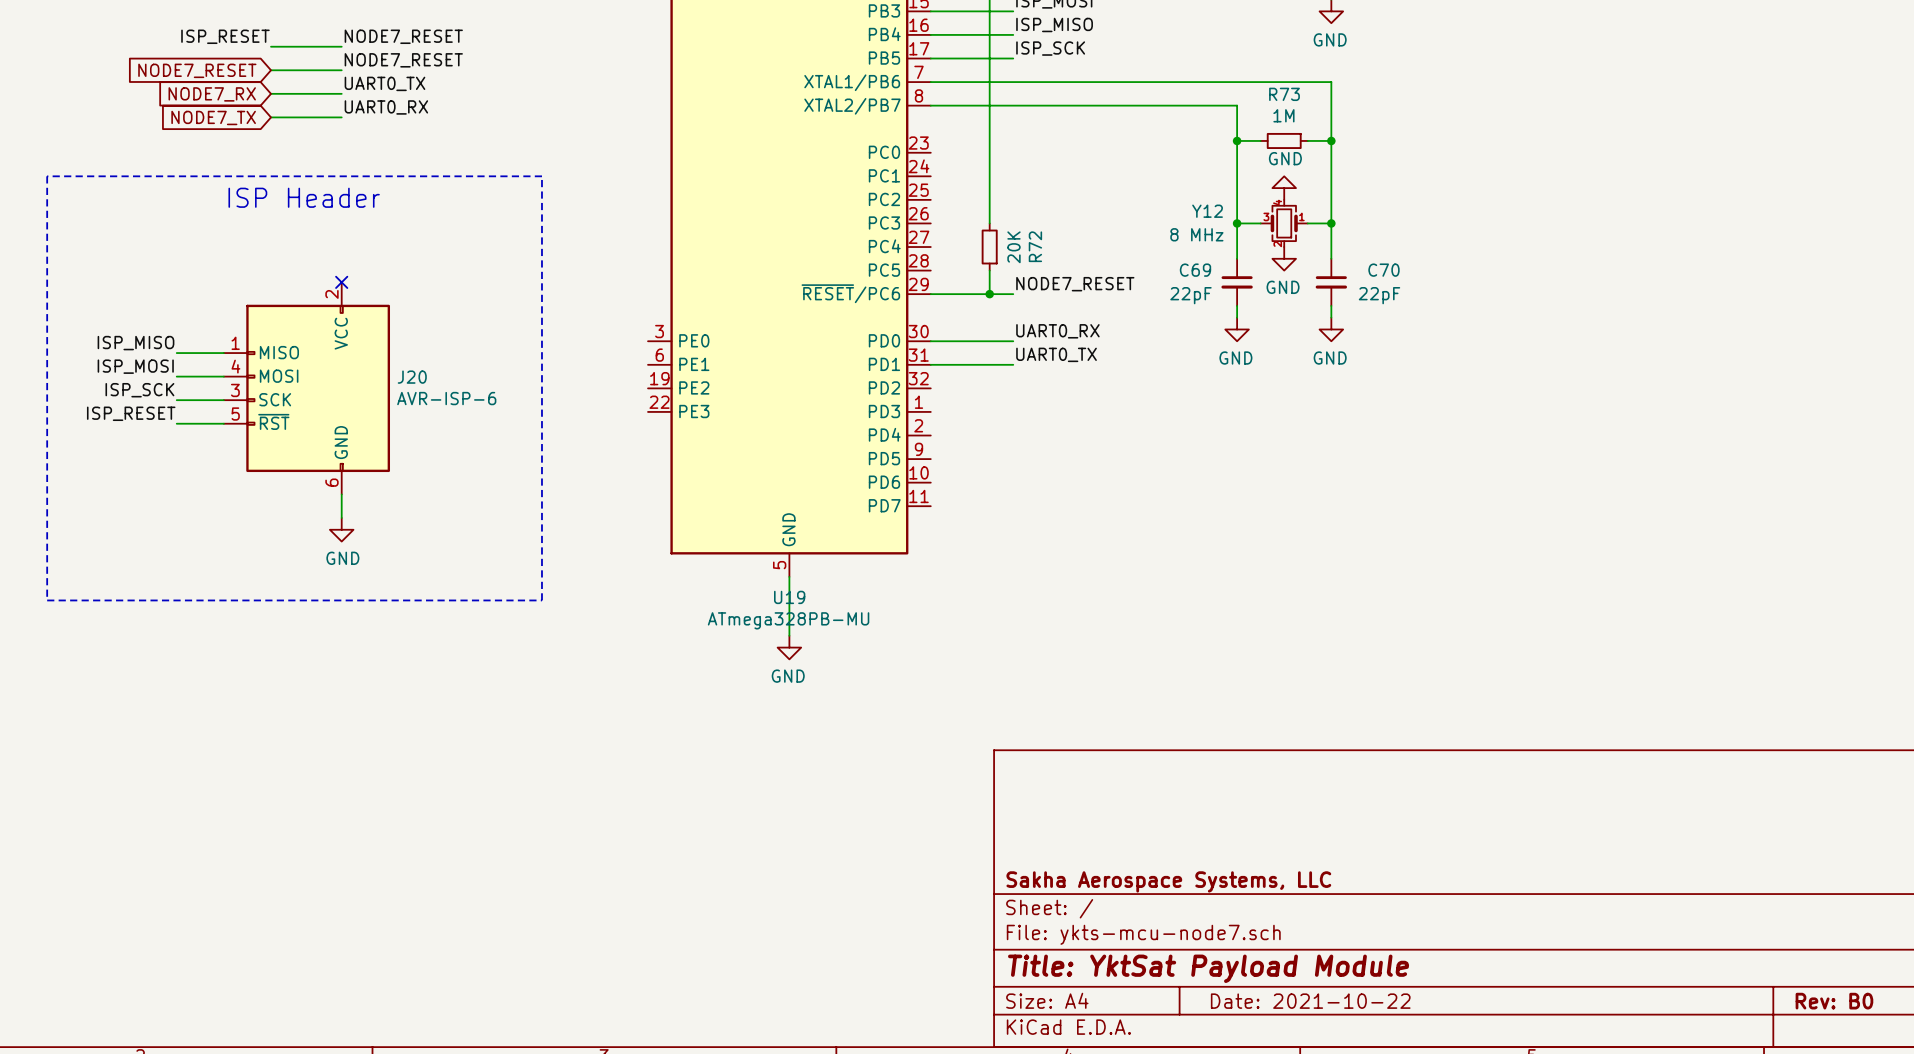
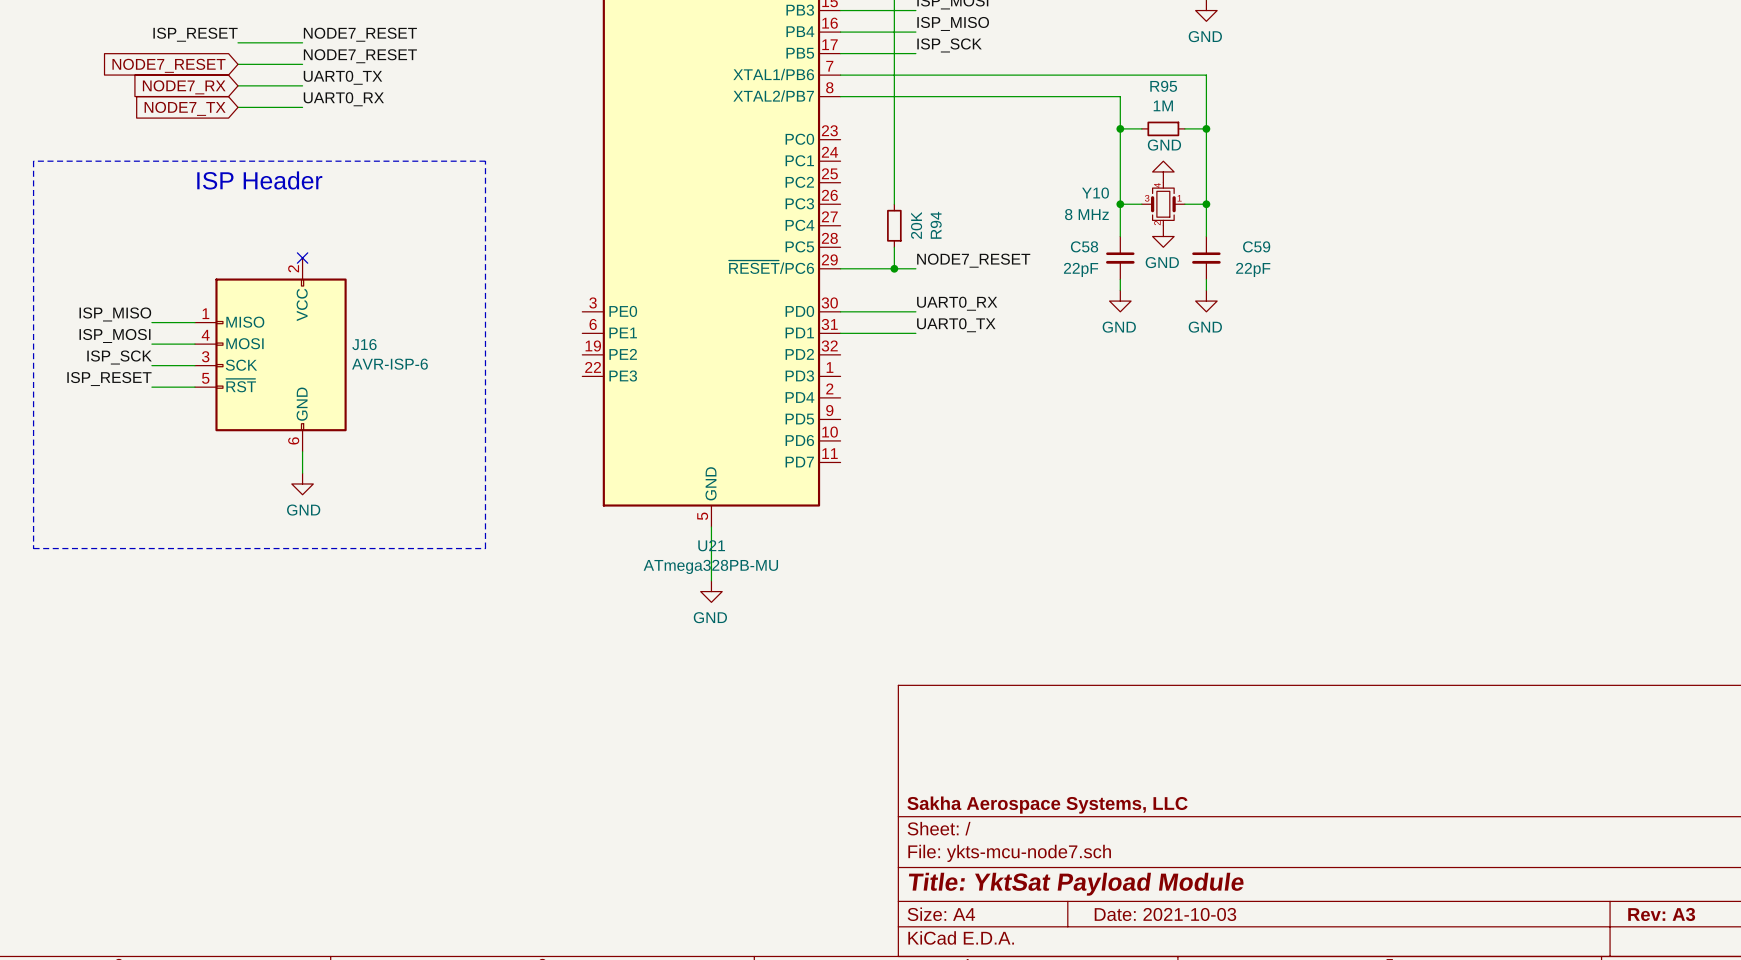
R73 name: R73 (1284, 94) -> R95 (1163, 86)
Y12 name: Y12 (1207, 211) -> Y10 (1095, 193)
R72 name: R72 (1035, 246) -> R94 (936, 225)
C69 name: C69 (1195, 270) -> C58 (1084, 246)
C70 name: C70 (1383, 270) -> C59 (1256, 246)
J20 name: J20 (412, 377) -> J16 (364, 344)
U19 name: U19 (789, 597) -> U21 (711, 545)
title block: Date: 2021-10-22 (1310, 1001) -> Date: 2021-10-03 (1165, 914)
title block: Rev: B0 (1834, 1001) -> Rev: A3 (1661, 914)

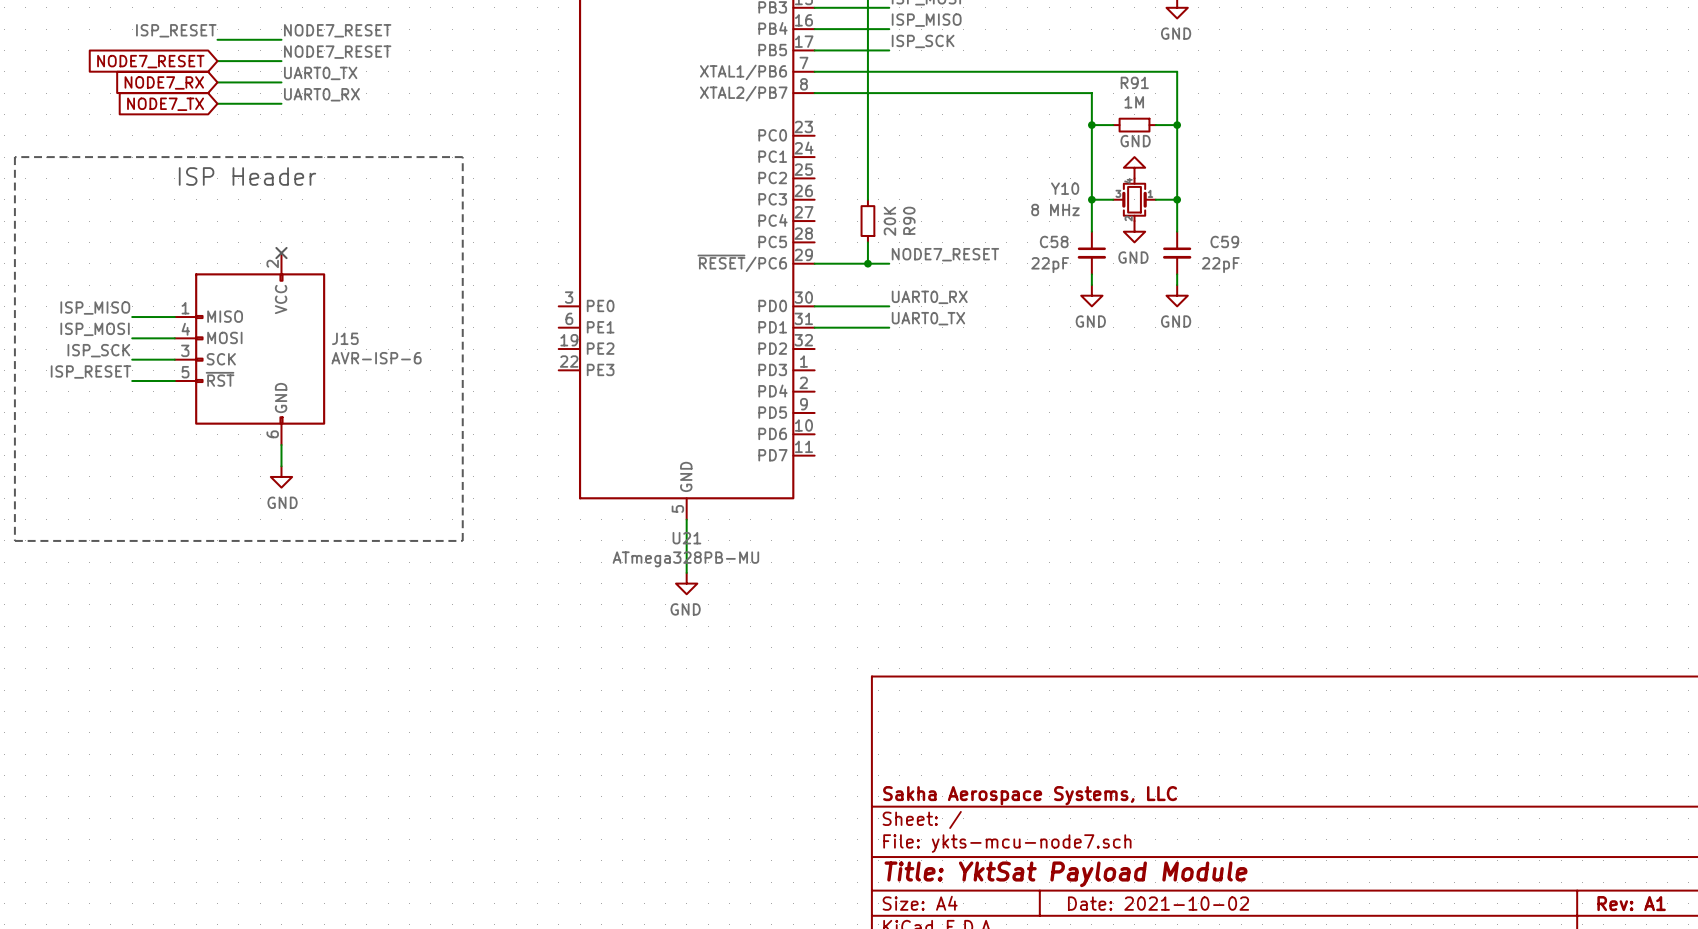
R95 name: R95 (1163, 86) -> R91 (1134, 82)
R94 name: R94 (936, 225) -> R90 (909, 220)
J16 name: J16 (364, 344) -> J15 (345, 338)
title block: Date: 2021-10-03 (1165, 914) -> Date: 2021-10-02 (1158, 903)
title block: Rev: A3 (1661, 914) -> Rev: A1 (1631, 903)

